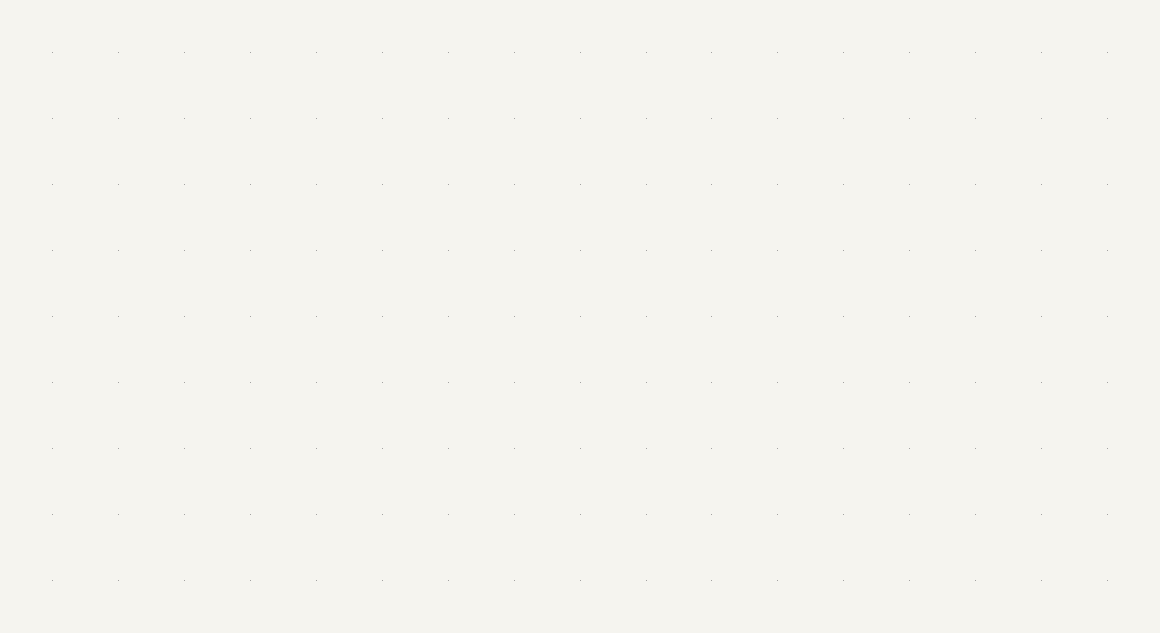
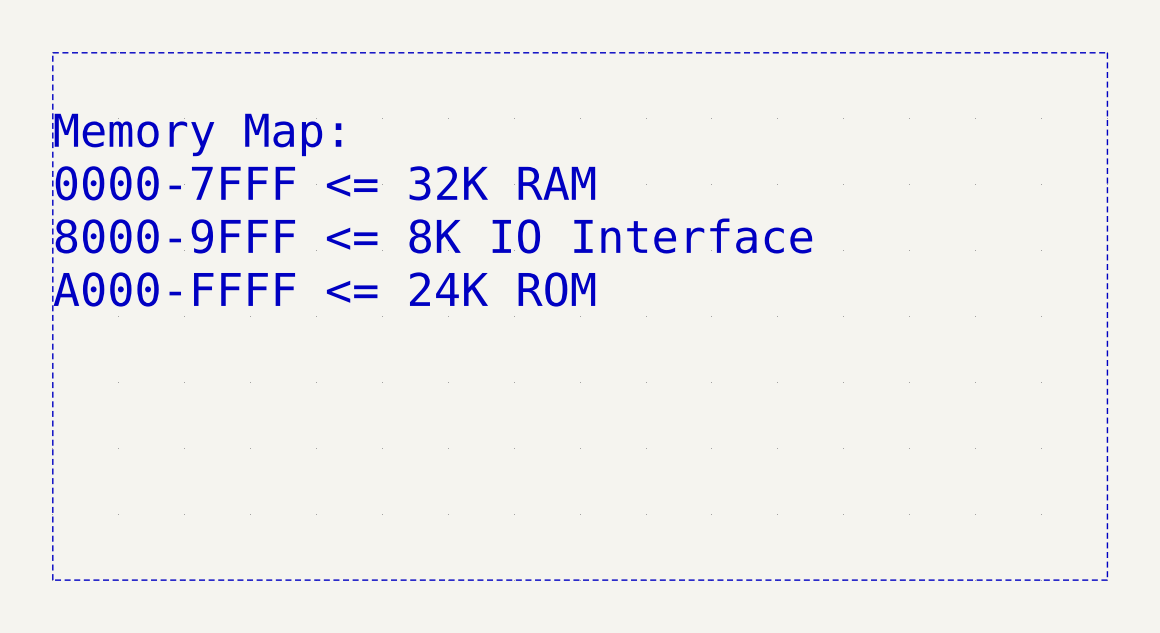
line: none -> (52, 52) (1107, 52) (1107, 580) (52, 580) (52, 52)
text: none -> Memory Map: (198, 134)
text: none -> 0000-7FFF <= 32K RAM (325, 183)
text: none -> 8000-9FFF <= 8K IO Interface (433, 236)
text: none -> A000-FFFF <= 24K ROM (324, 289)

